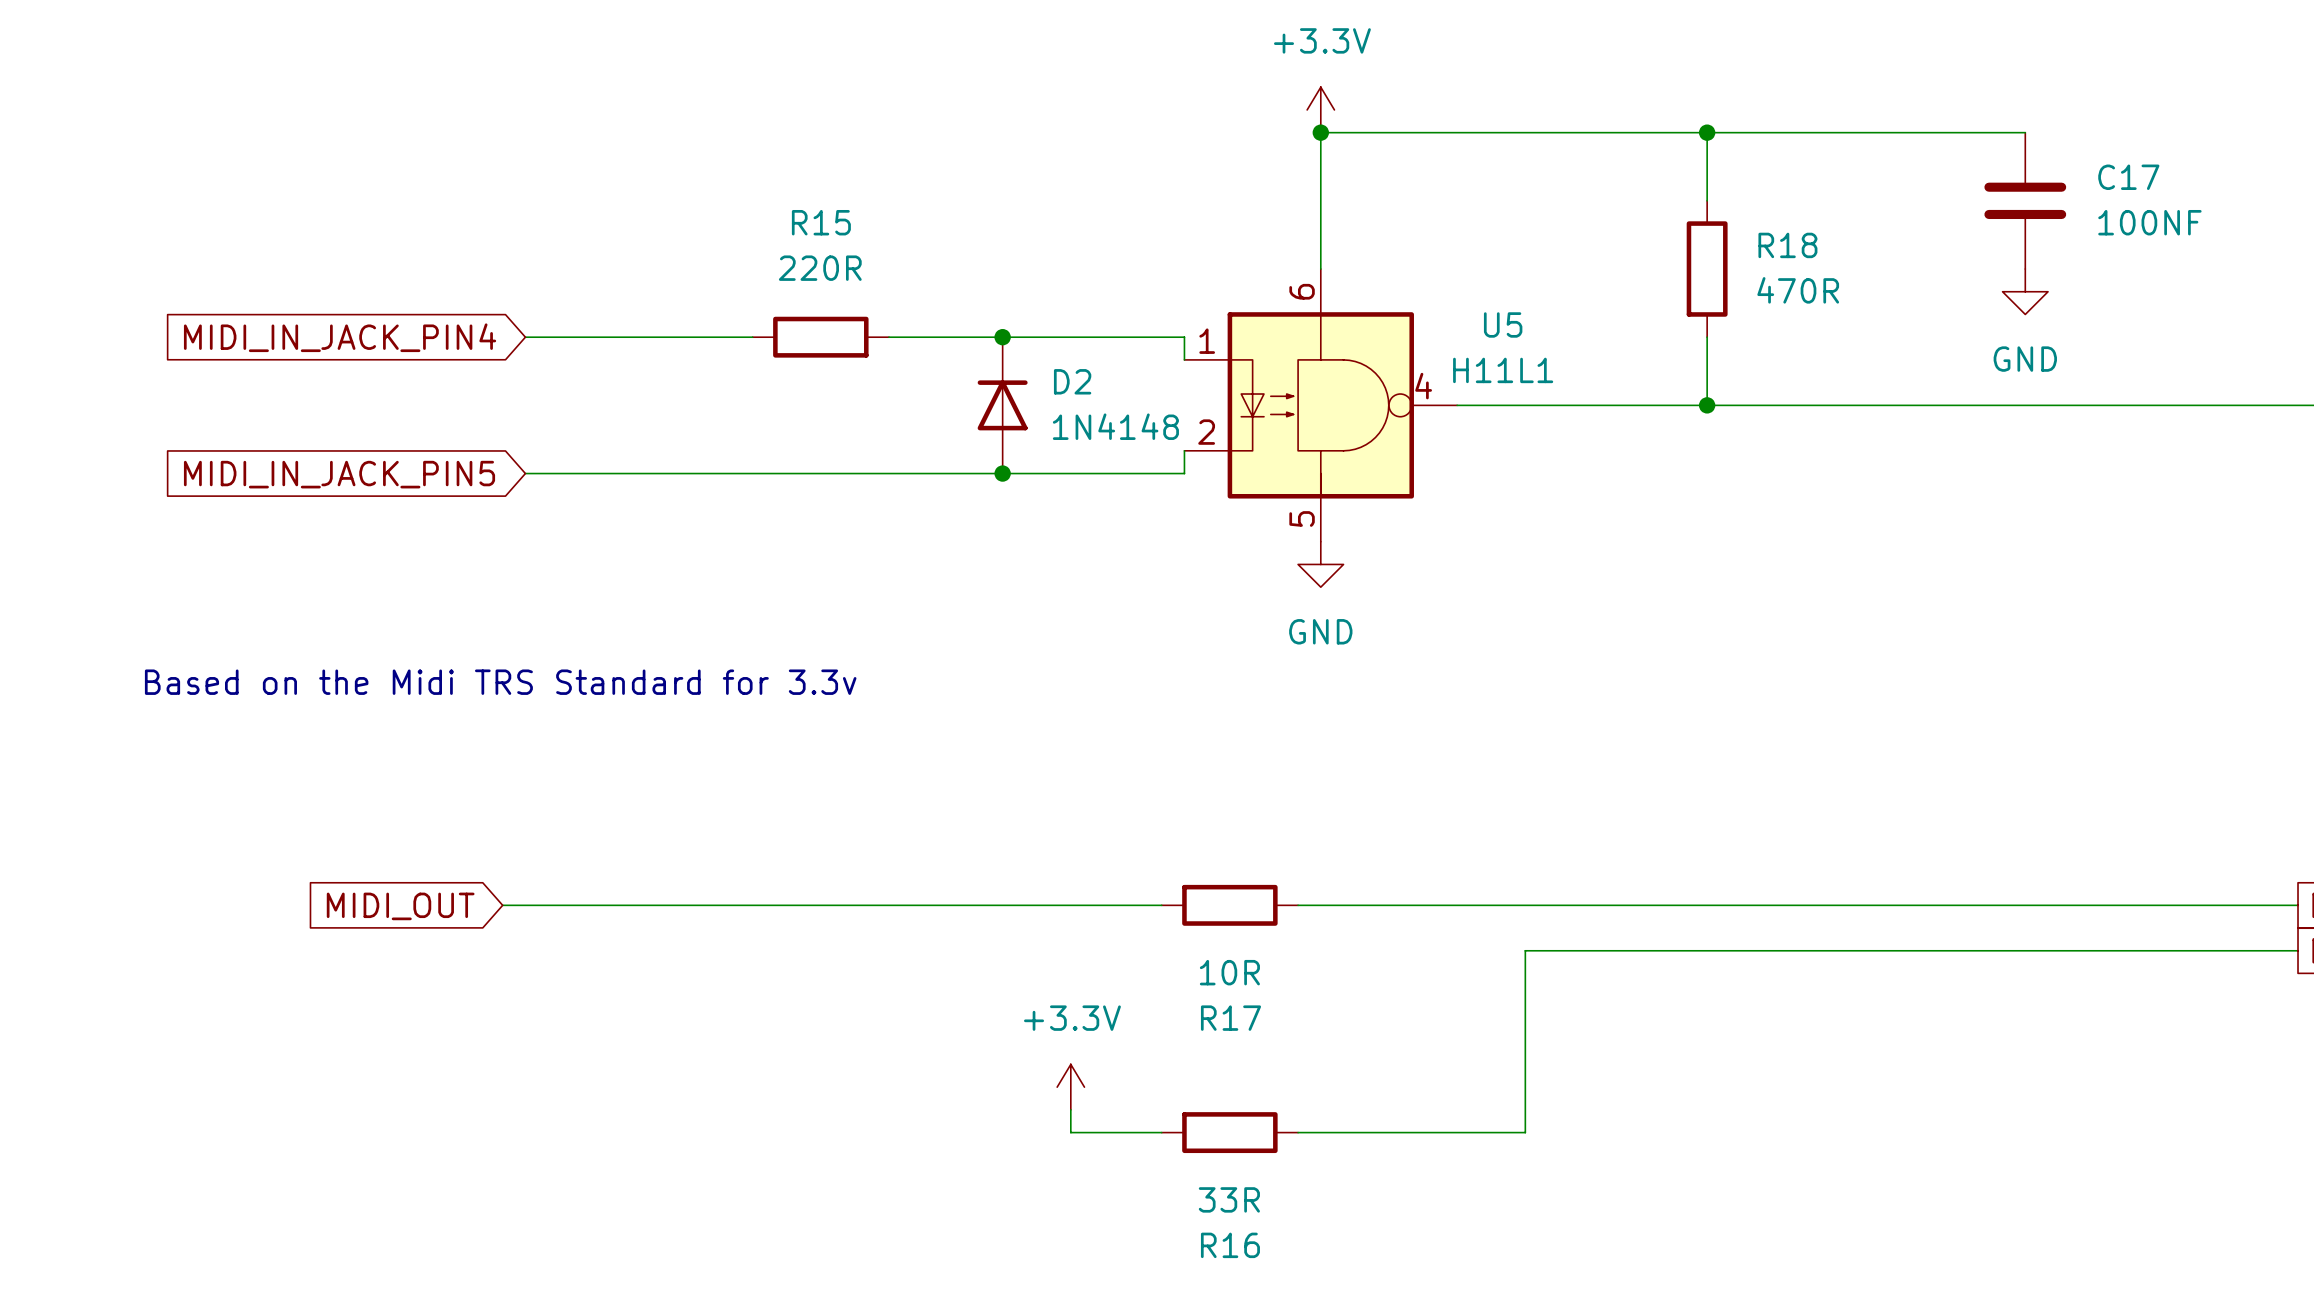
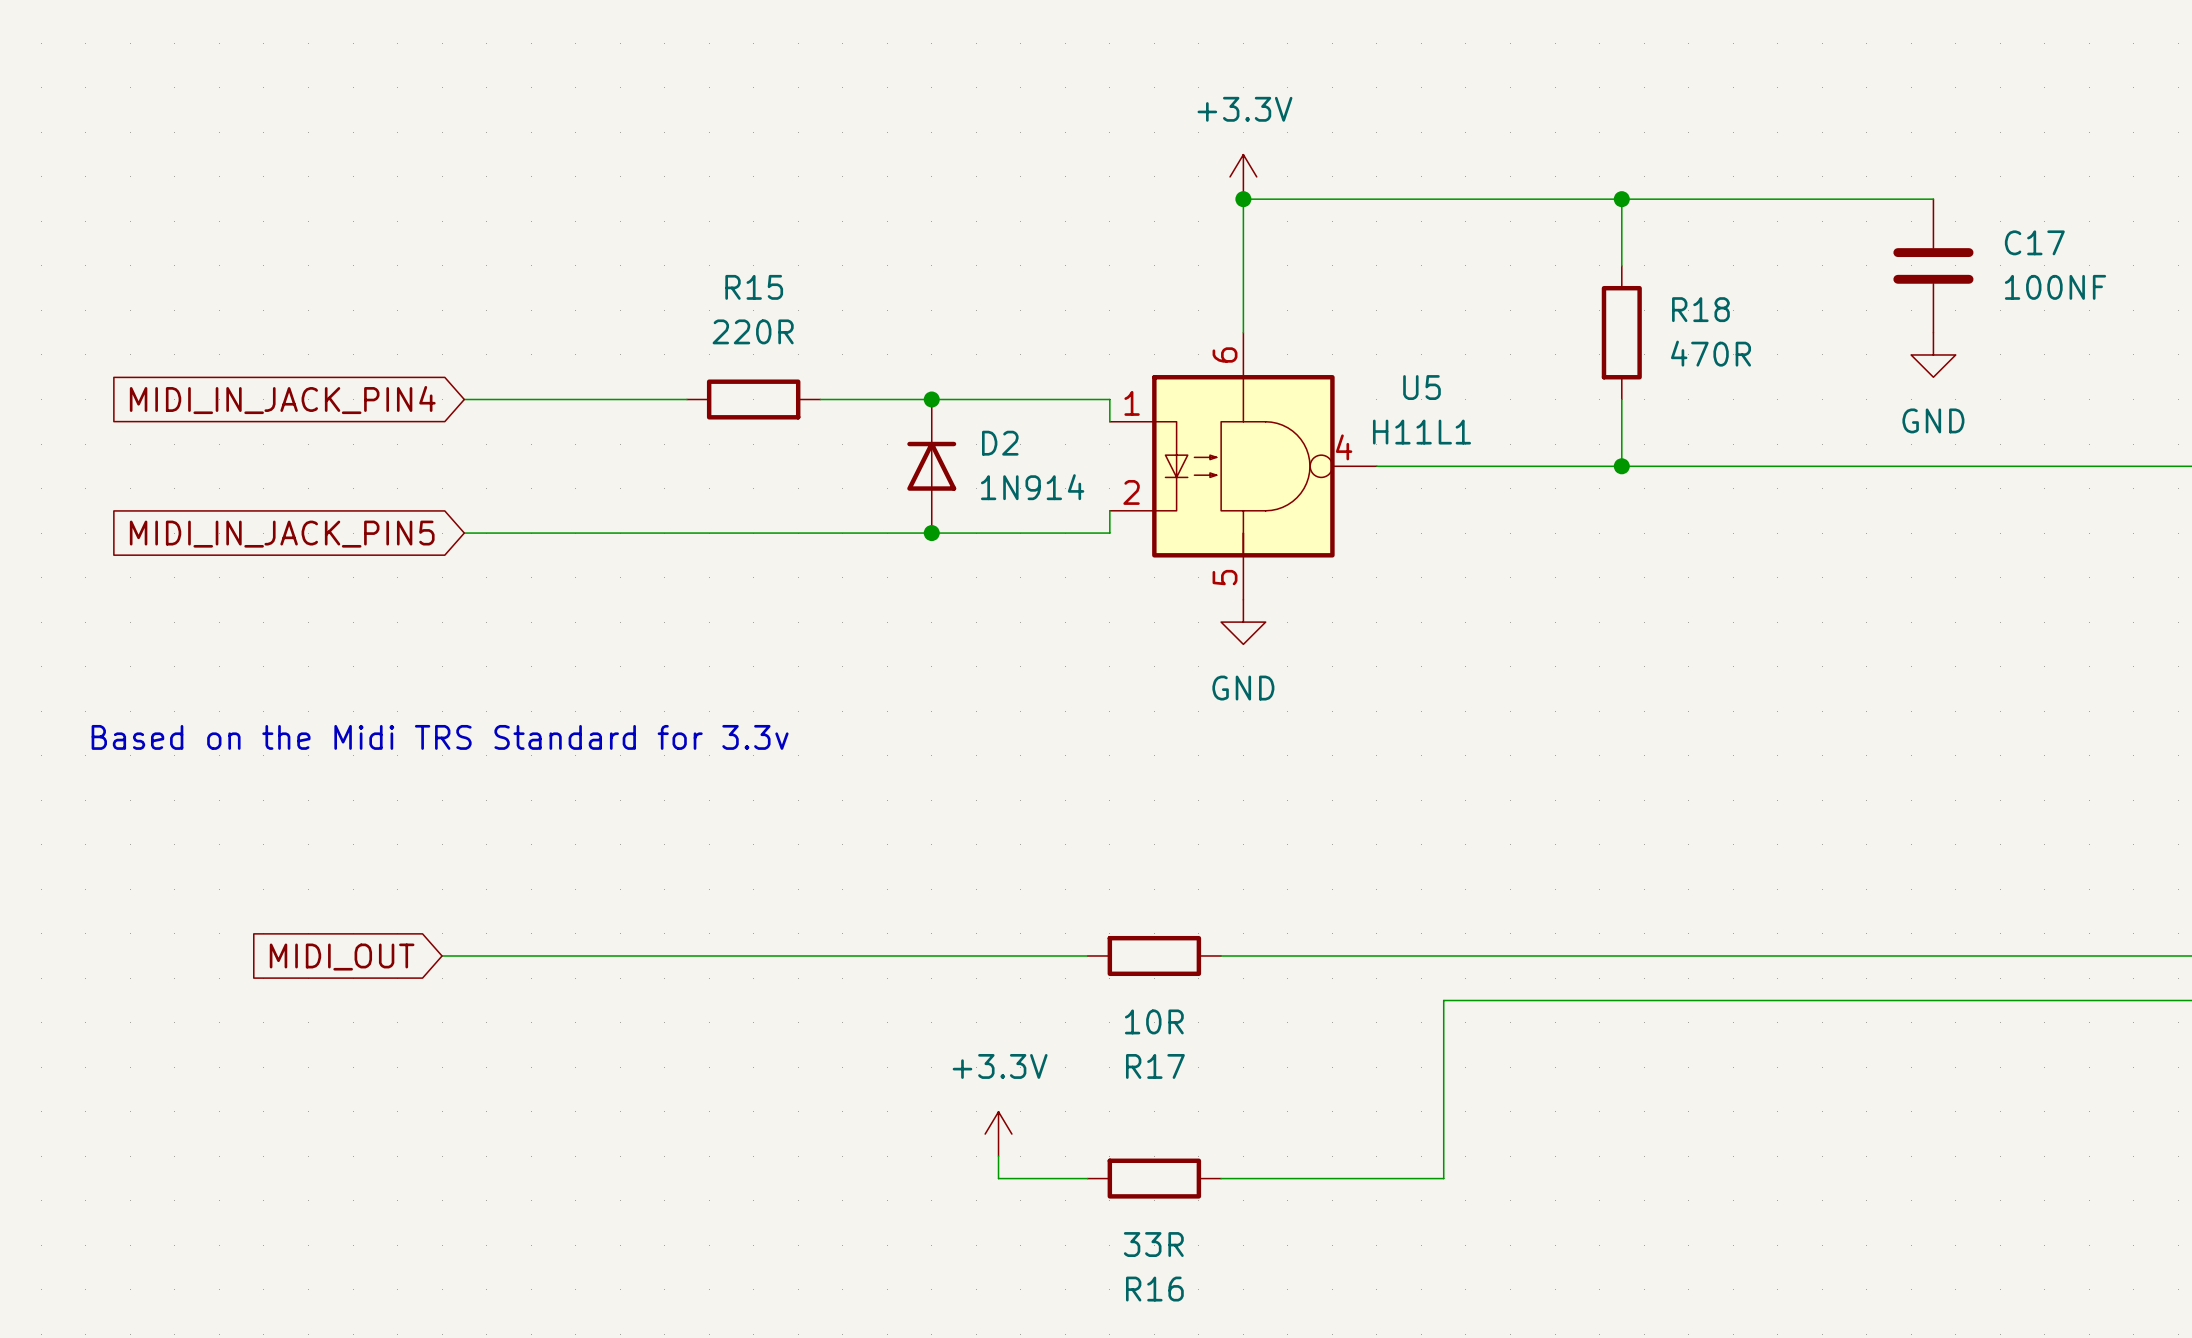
D2 value: 1N4148 (1115, 426) -> 1N914 (1032, 487)

